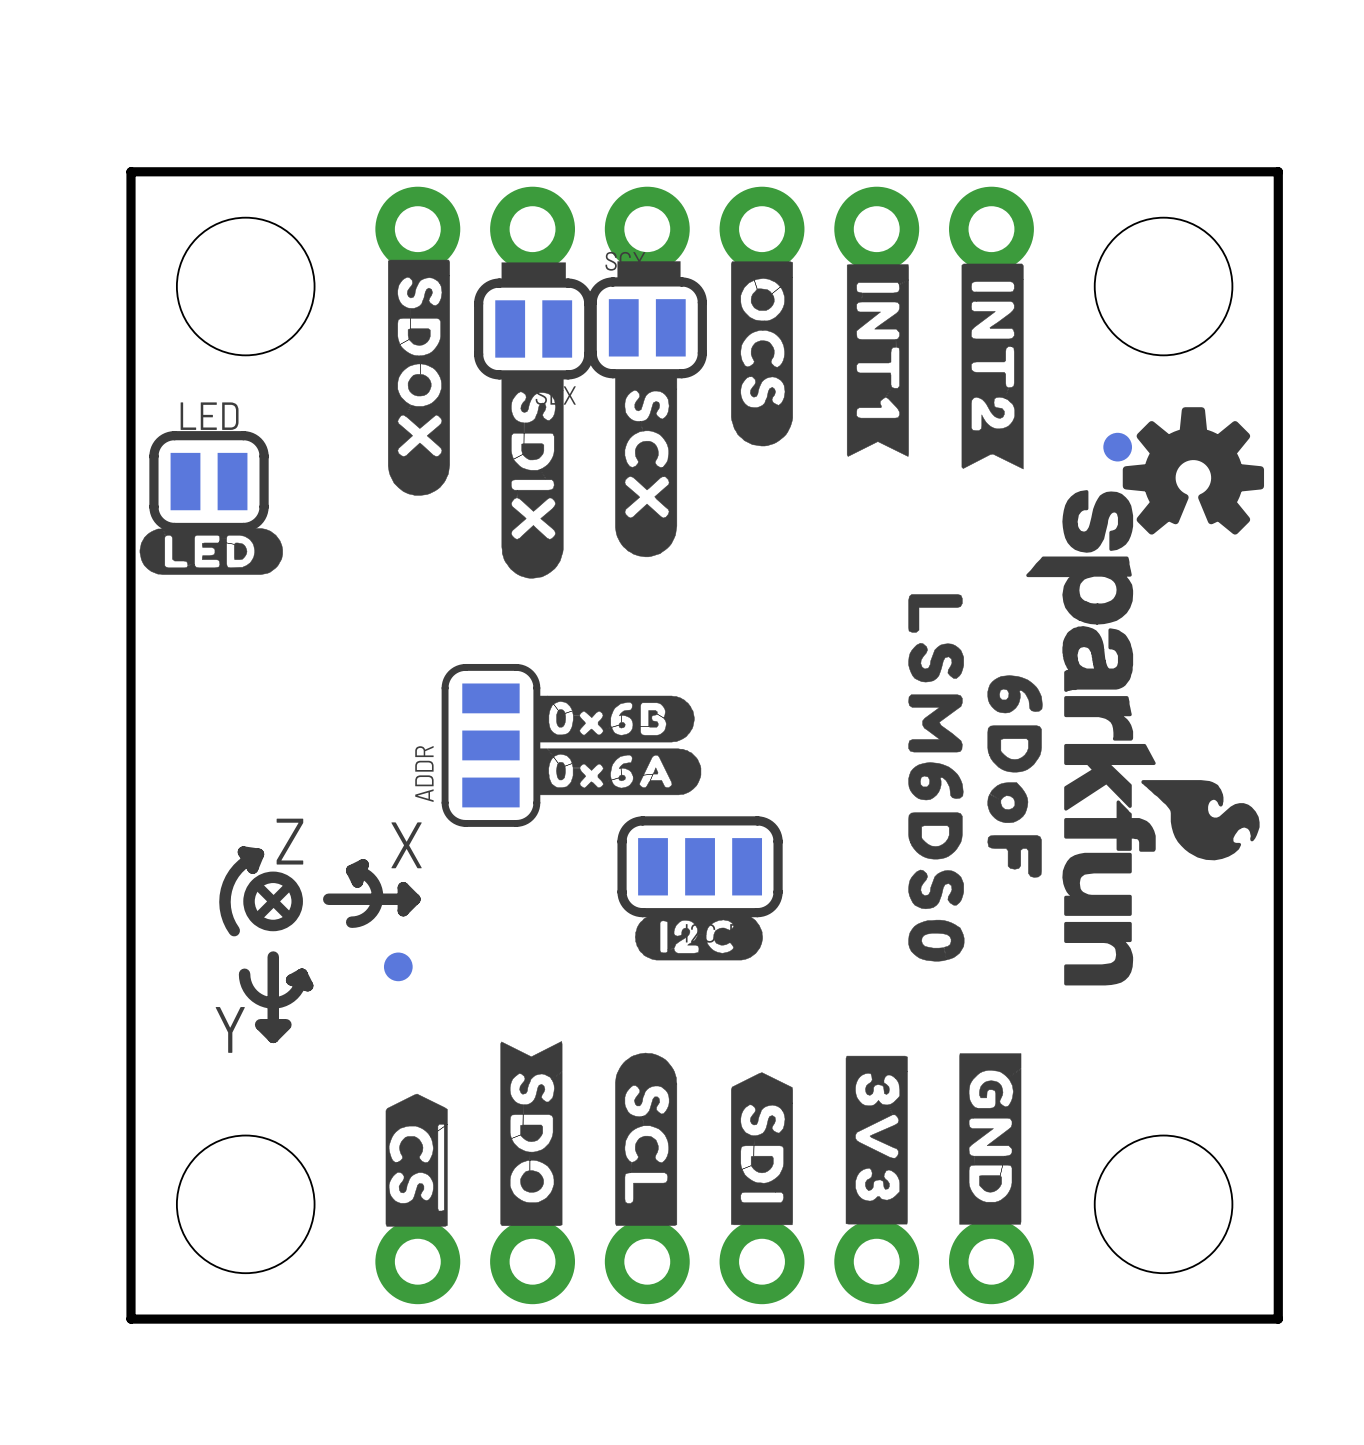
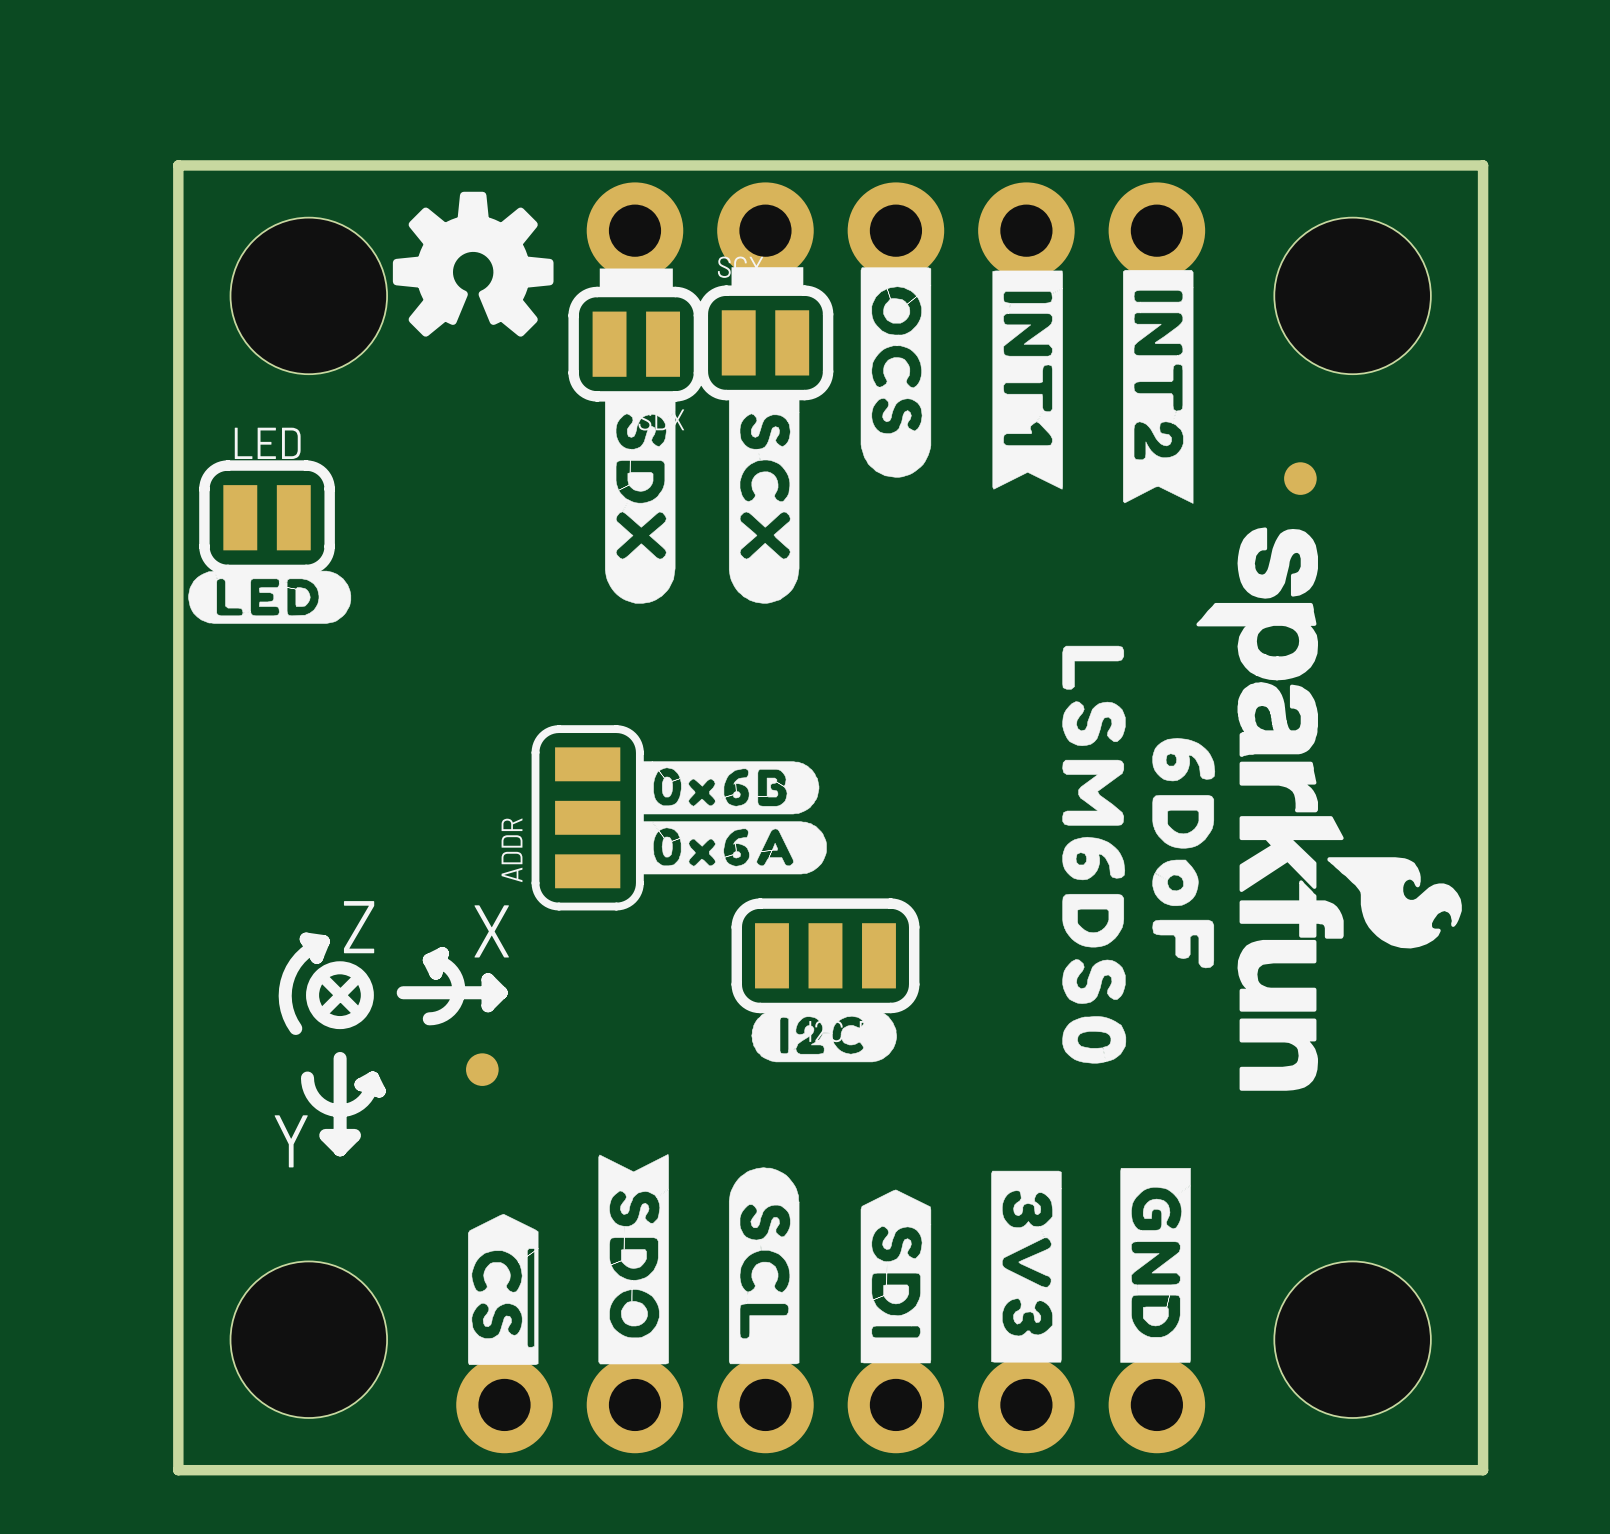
part: (704, 229) -> none
drawing: [388, 259, 450, 496] -> none
drawing shape: [501, 374, 564, 579] -> [605, 394, 676, 604]
drawing position: (1193, 470) -> (473, 264)

